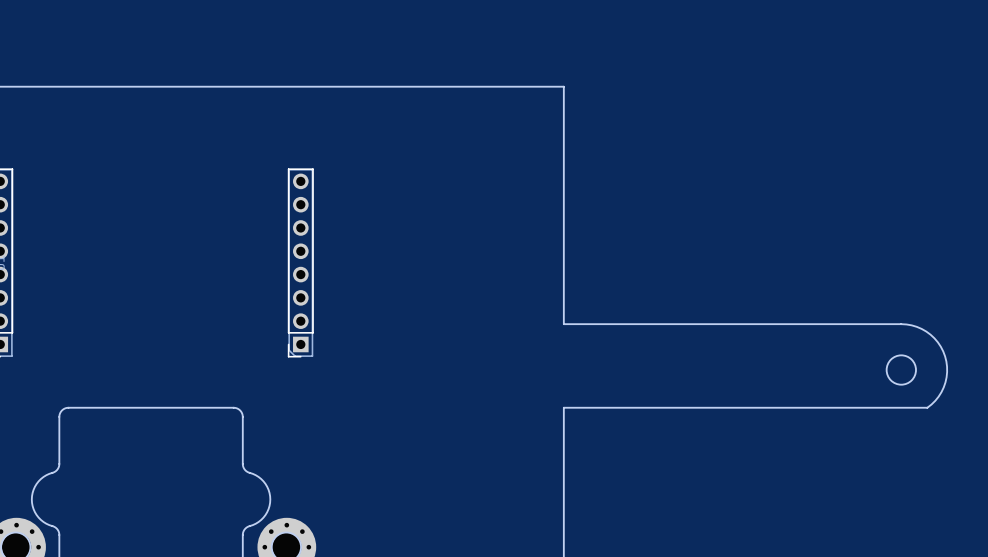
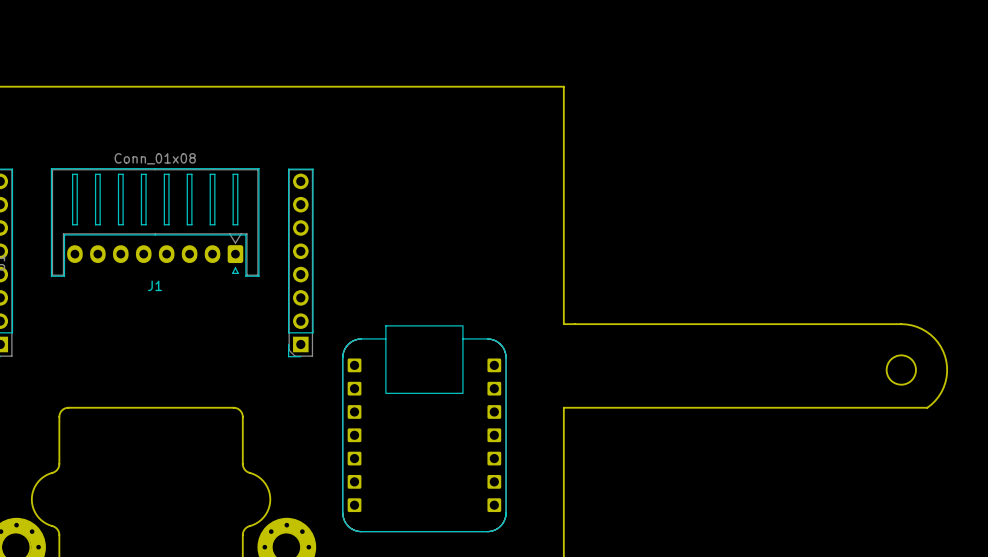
J1: none -> Conn_01x08 (155, 222)
part: none -> (424, 428)

